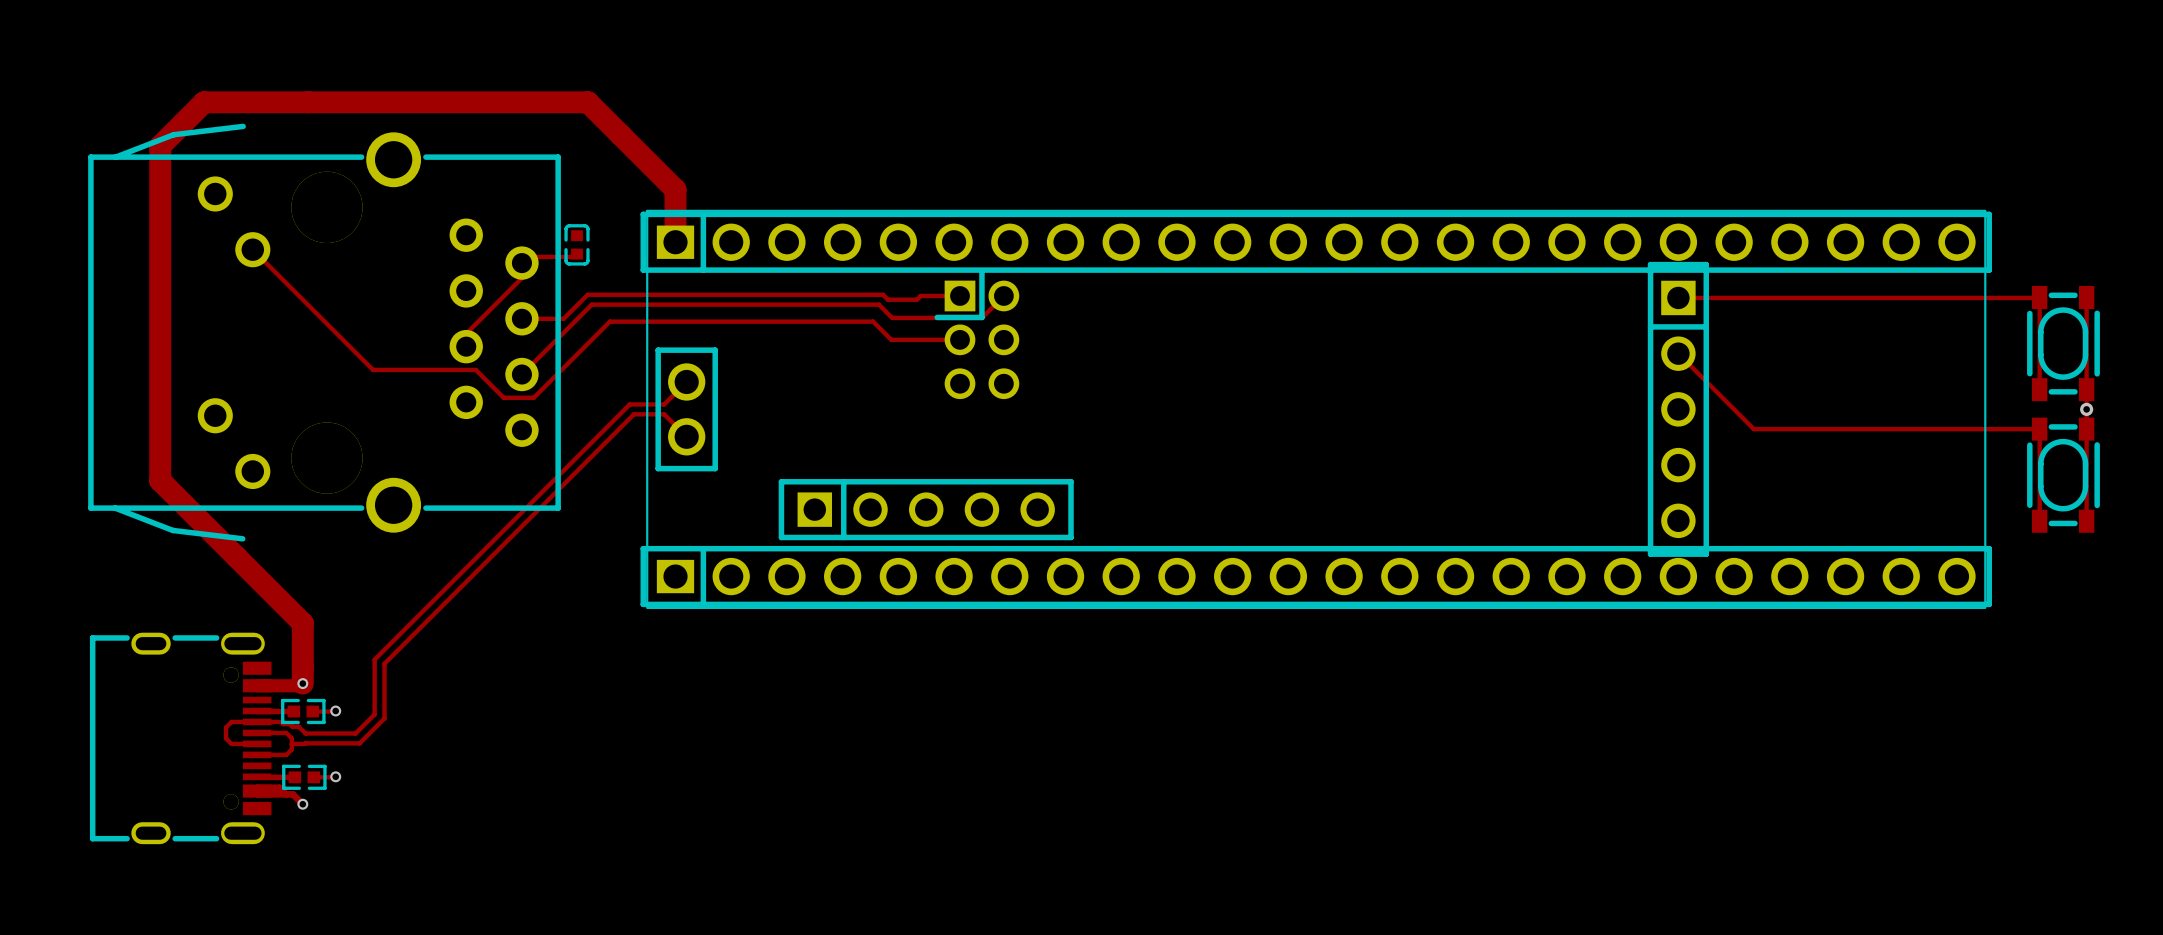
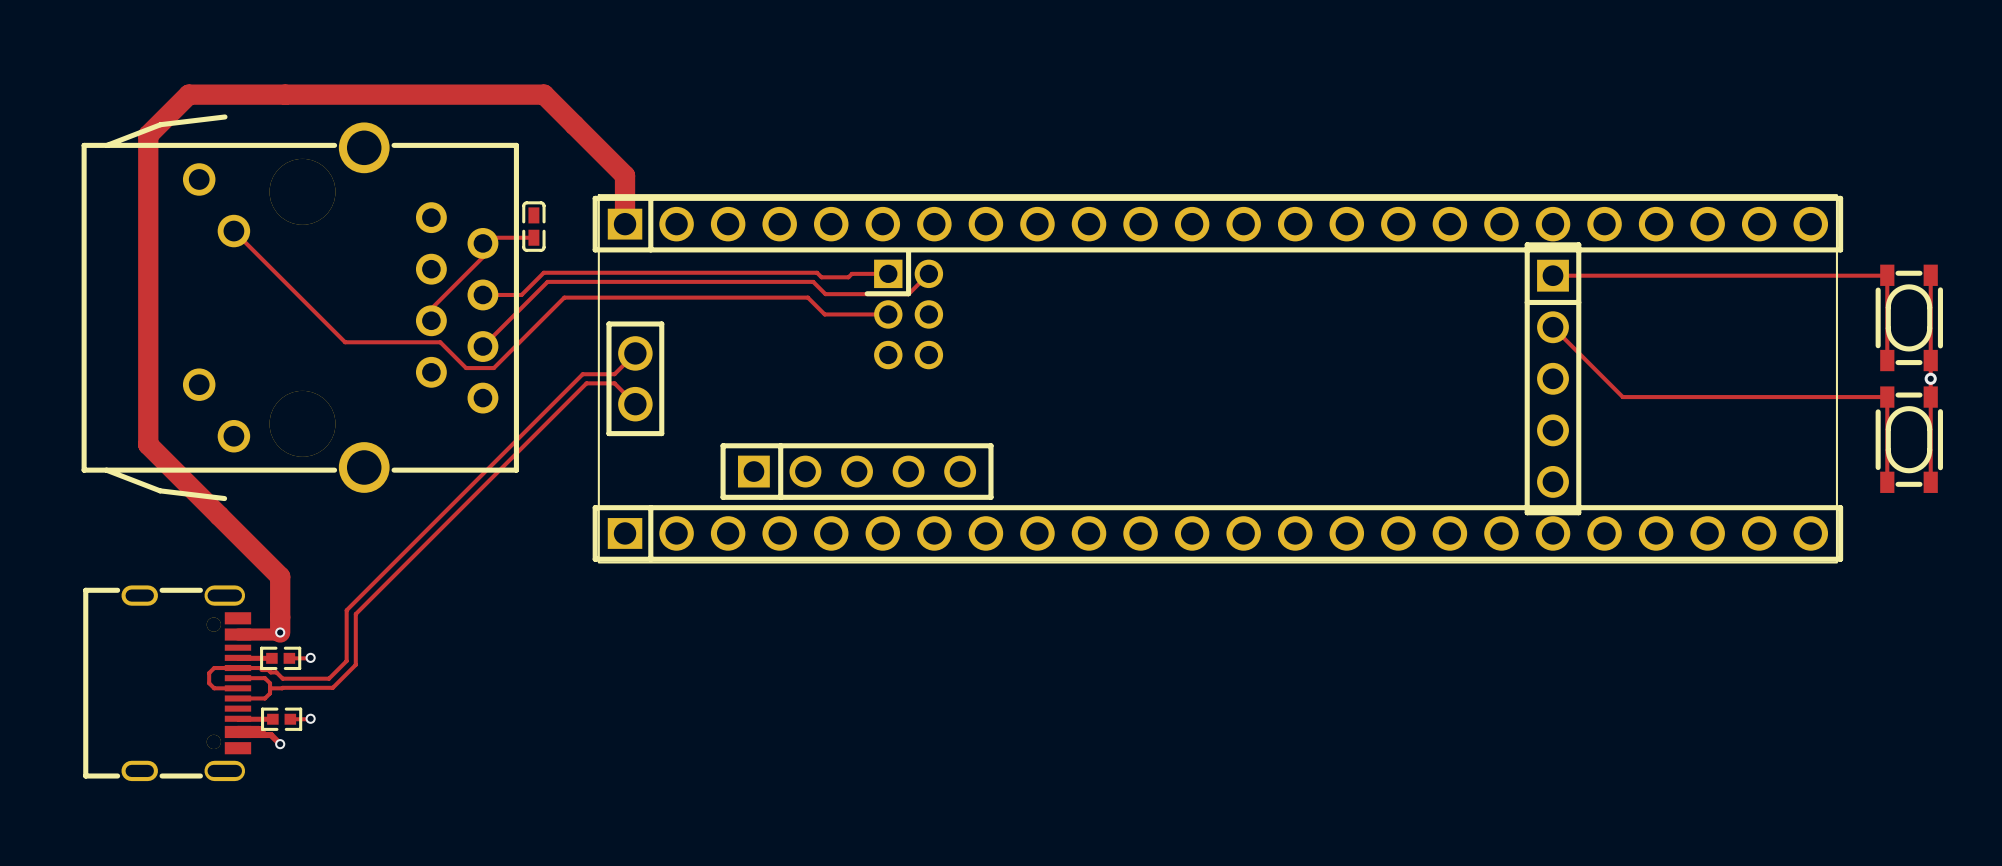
part footprint: [564, 224, 590, 266] -> [522, 201, 546, 252]

